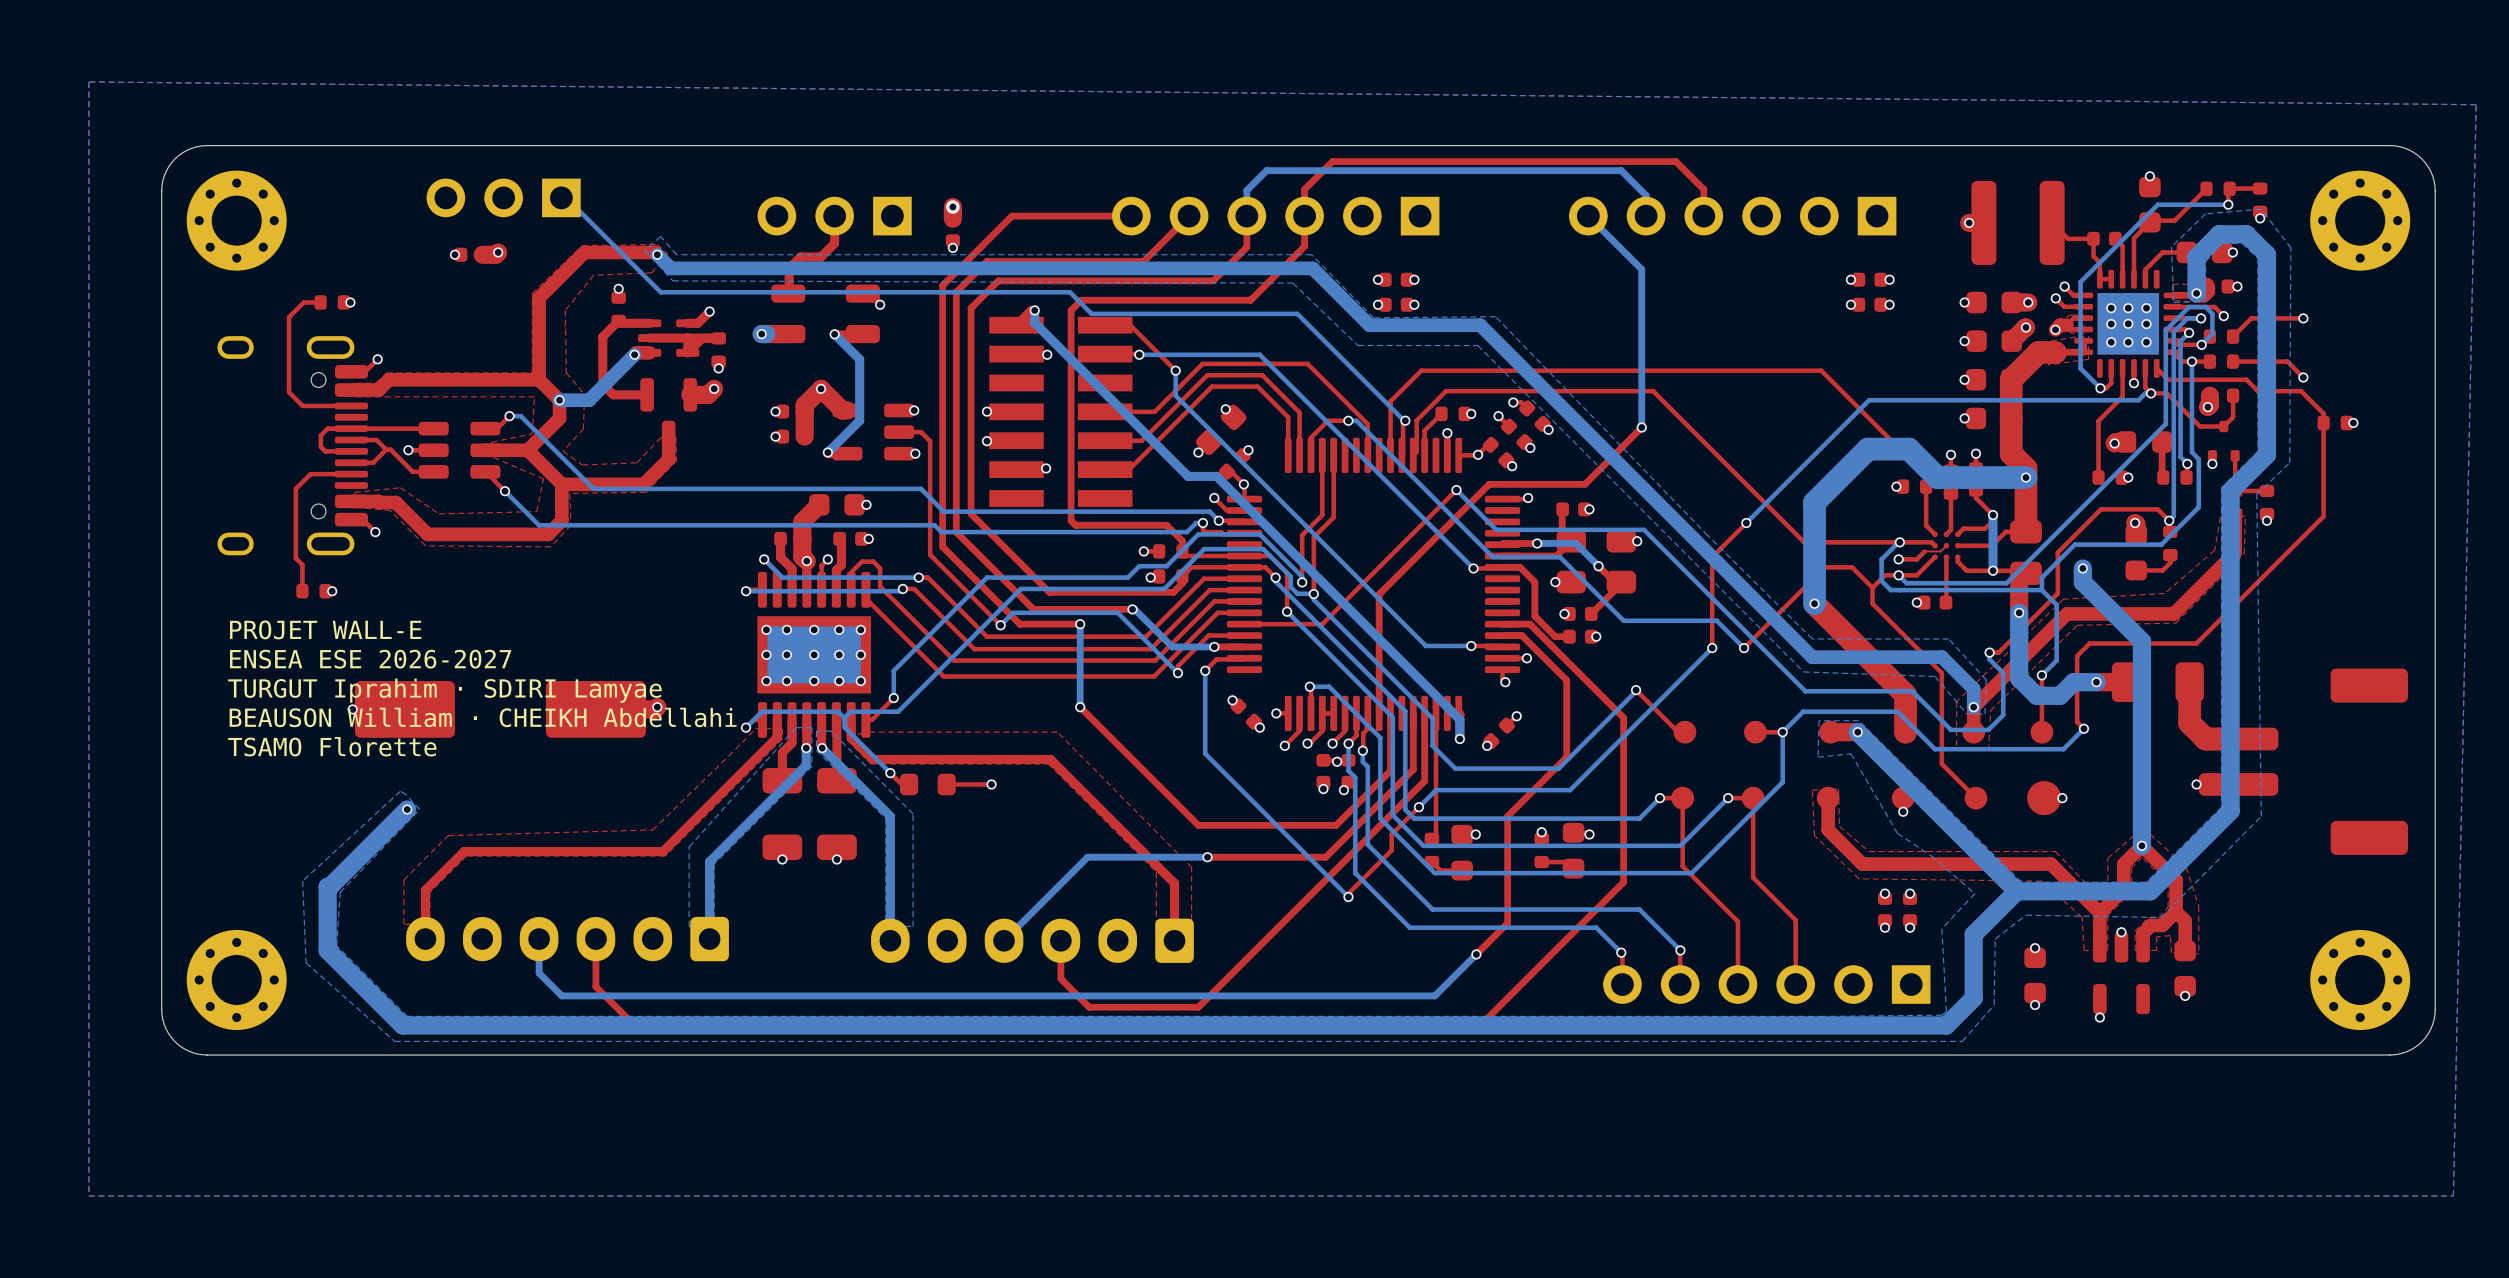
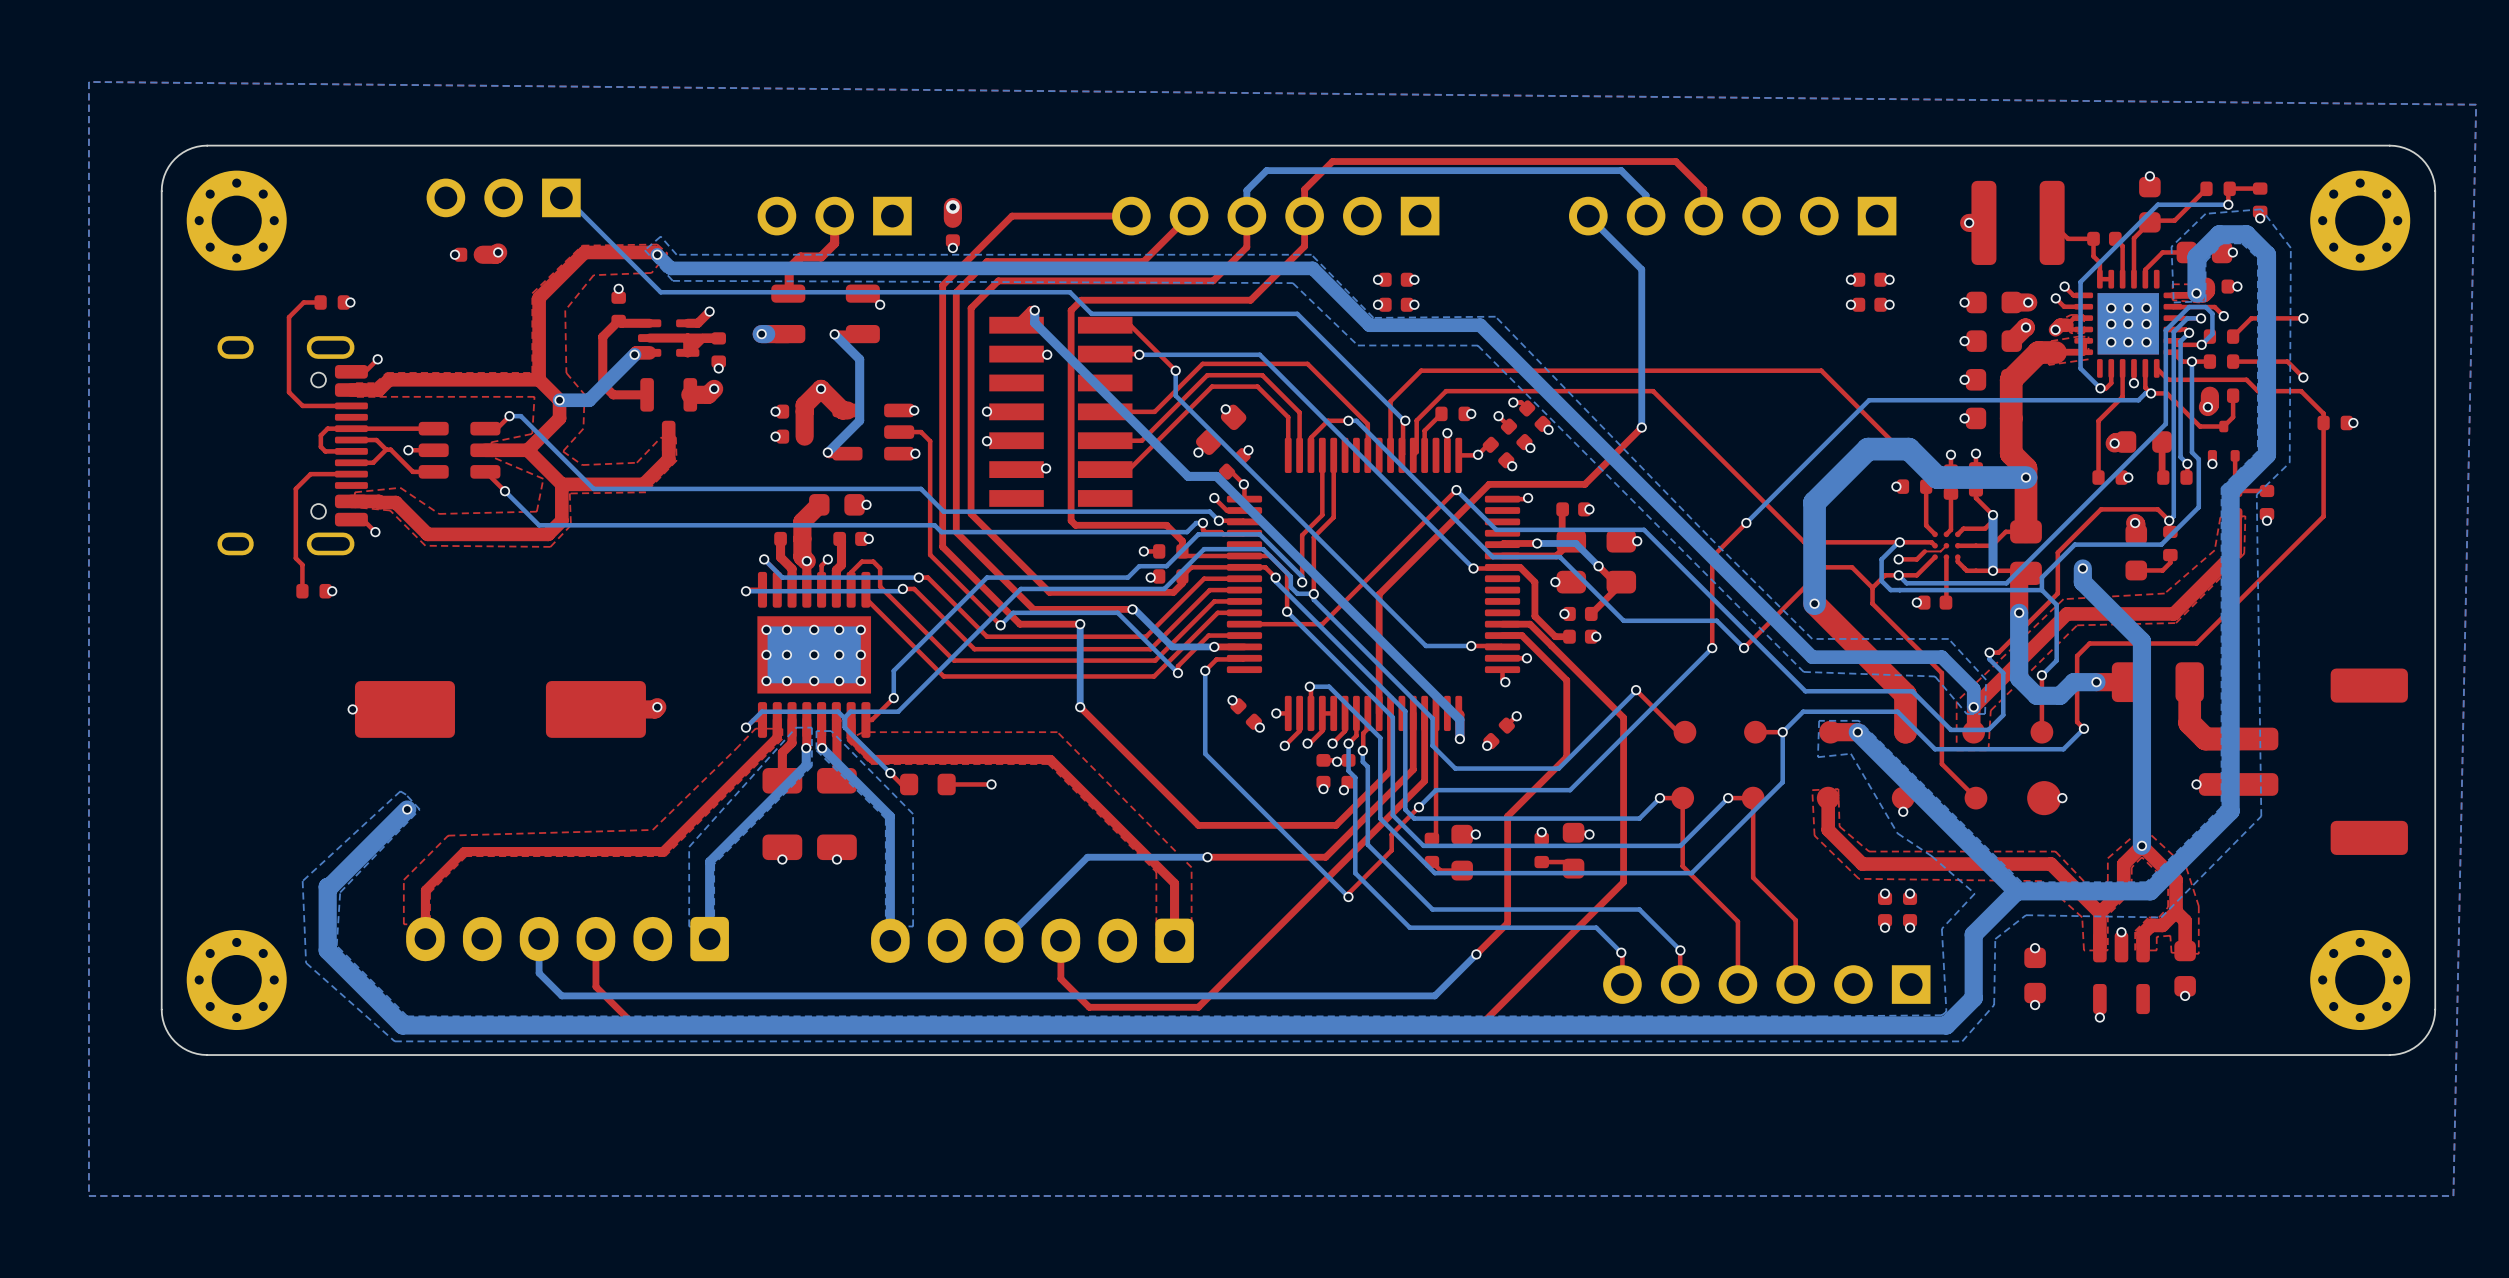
text: PROJET WALL-E (325, 629) -> none
text: ENSEA ESE 2026-2027 (370, 659) -> none
text: TURGUT Iprahim · SDIRI Lamyae (444, 690) -> none
text: BEAUSON William · CHEIKH Abdellahi (483, 717) -> none
text: TSAMO Florette (332, 746) -> none

